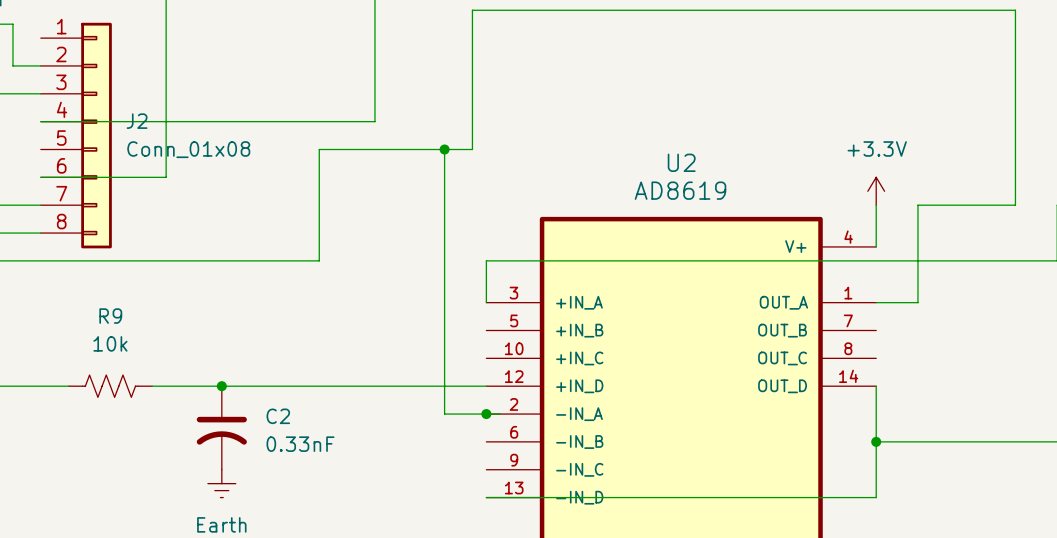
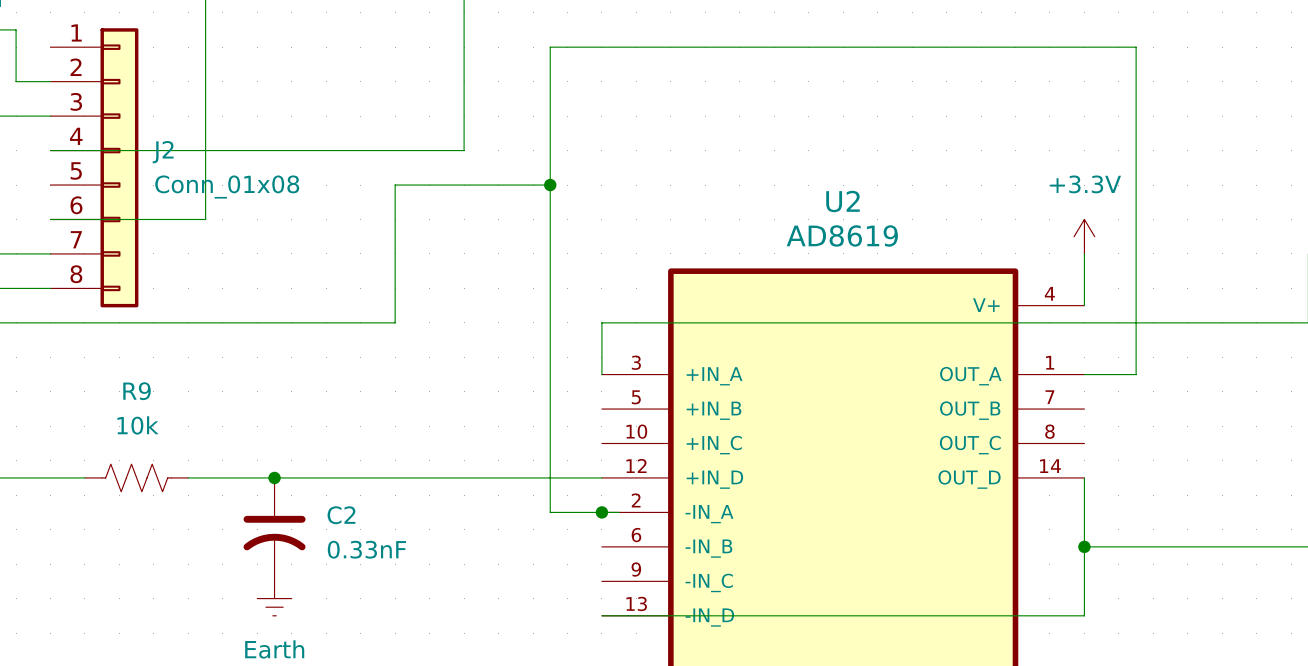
wire: (444, 149) (472, 149) (472, 10) (1015, 10) (1015, 205) (917, 205) -> (550, 185) (550, 47) (1136, 47) (1136, 253)

